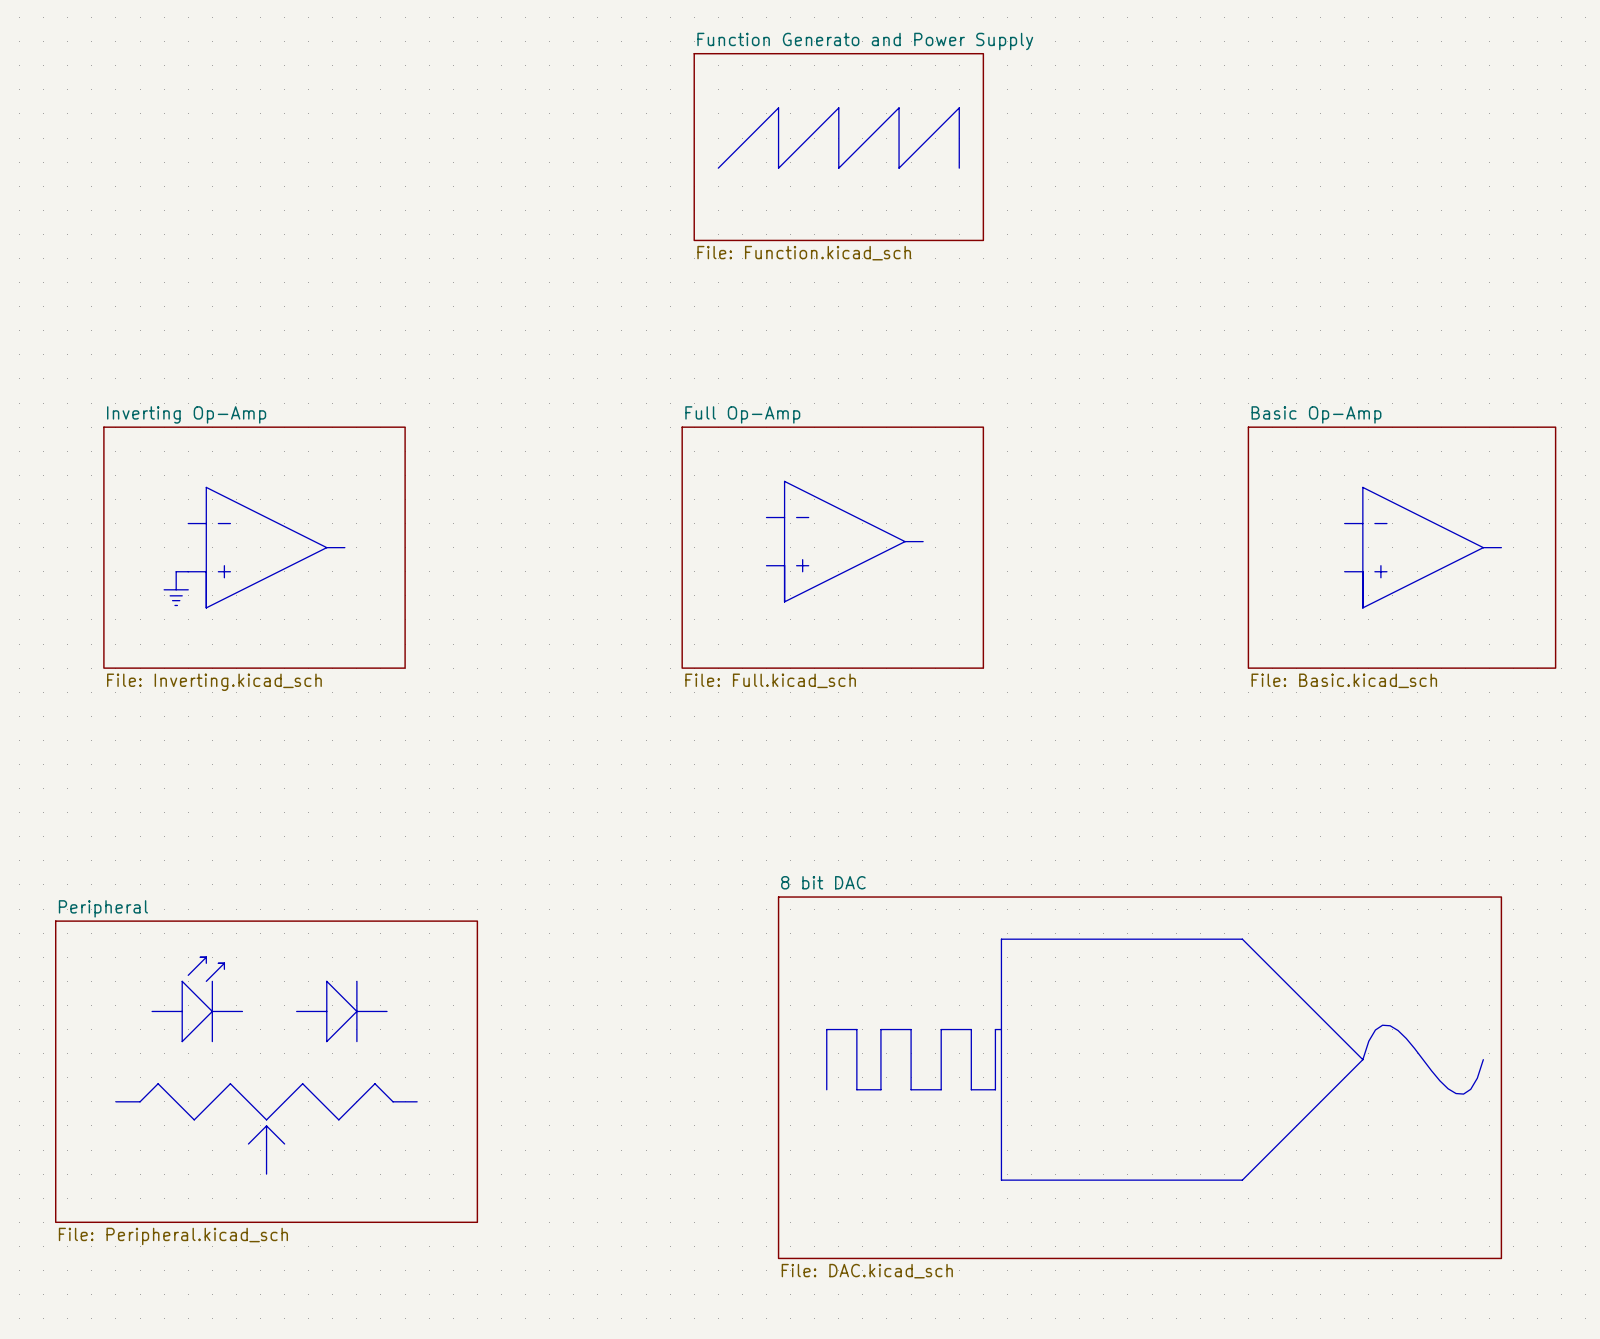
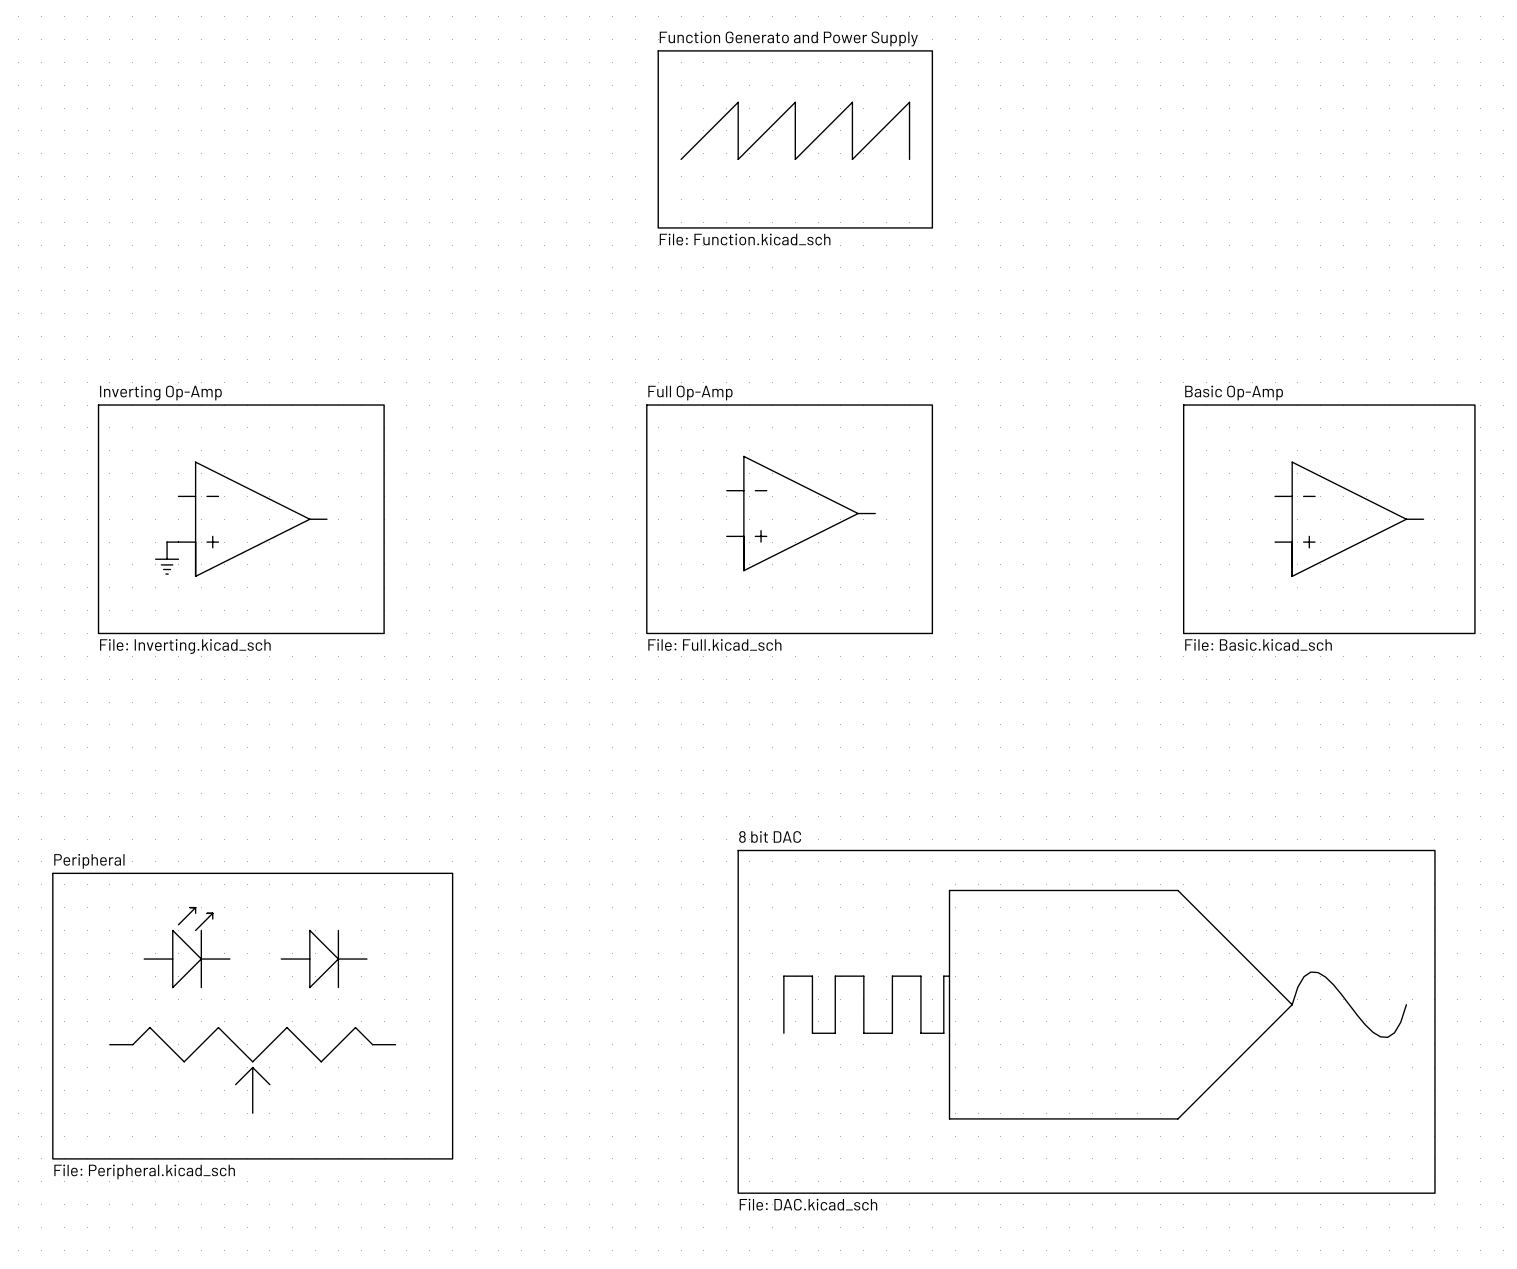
sheet 8 bit DAC shape: [777, 896, 1503, 1260] -> [737, 849, 1436, 1194]

